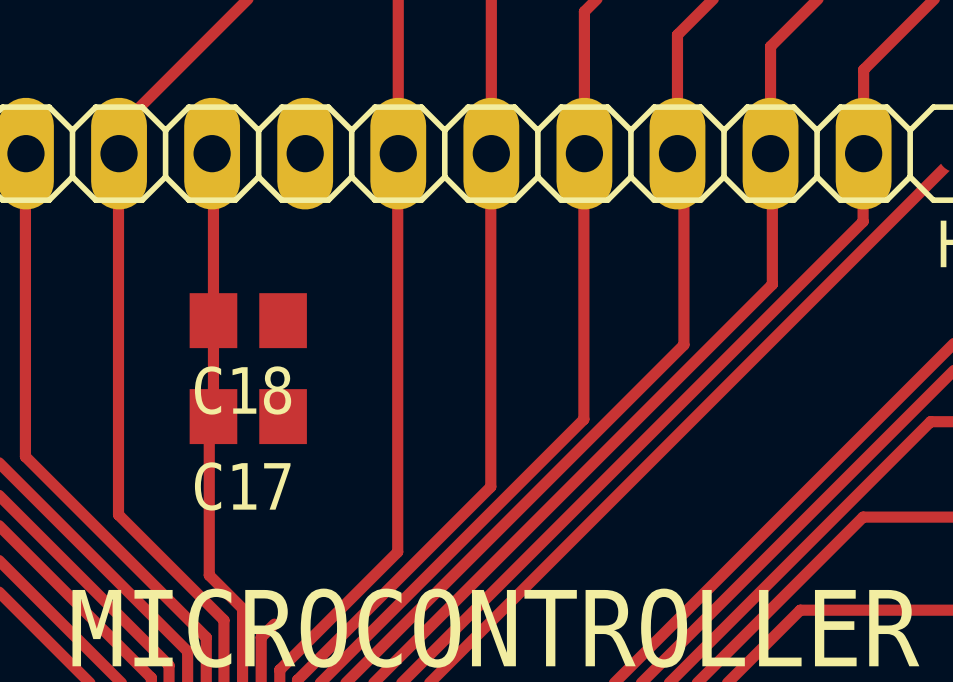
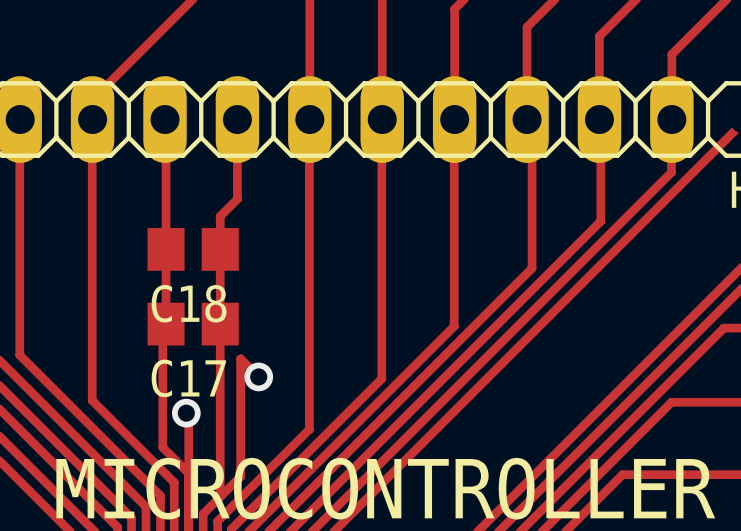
track: none -> (237, 119) (237, 199) (220, 216) (220, 496)
via: none -> (258, 376)
track: none -> (186, 413) (188, 415) (188, 473)
via: none -> (186, 413)
track: (274, 624) (261, 637) (261, 660) -> (258, 376) (240, 358) (240, 476) (203, 513)

